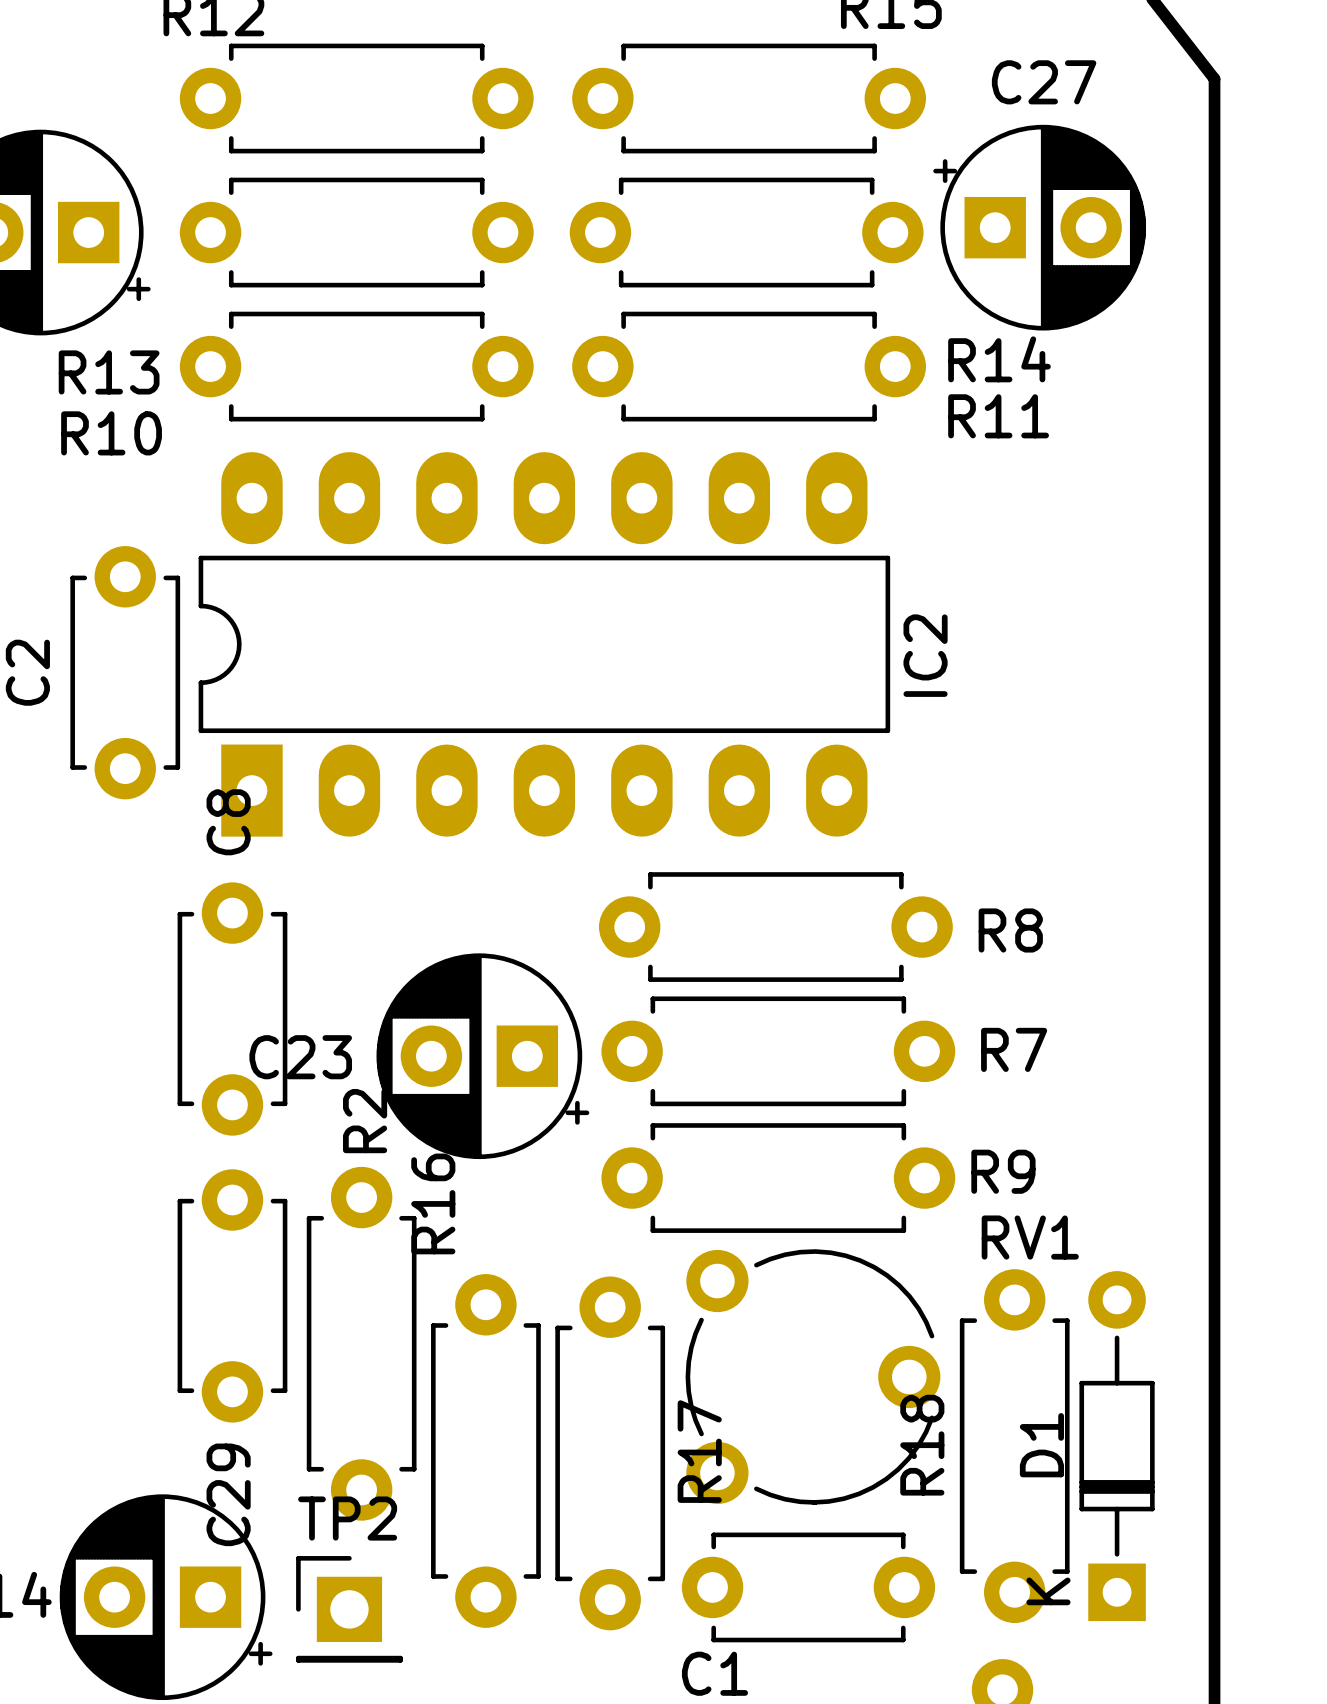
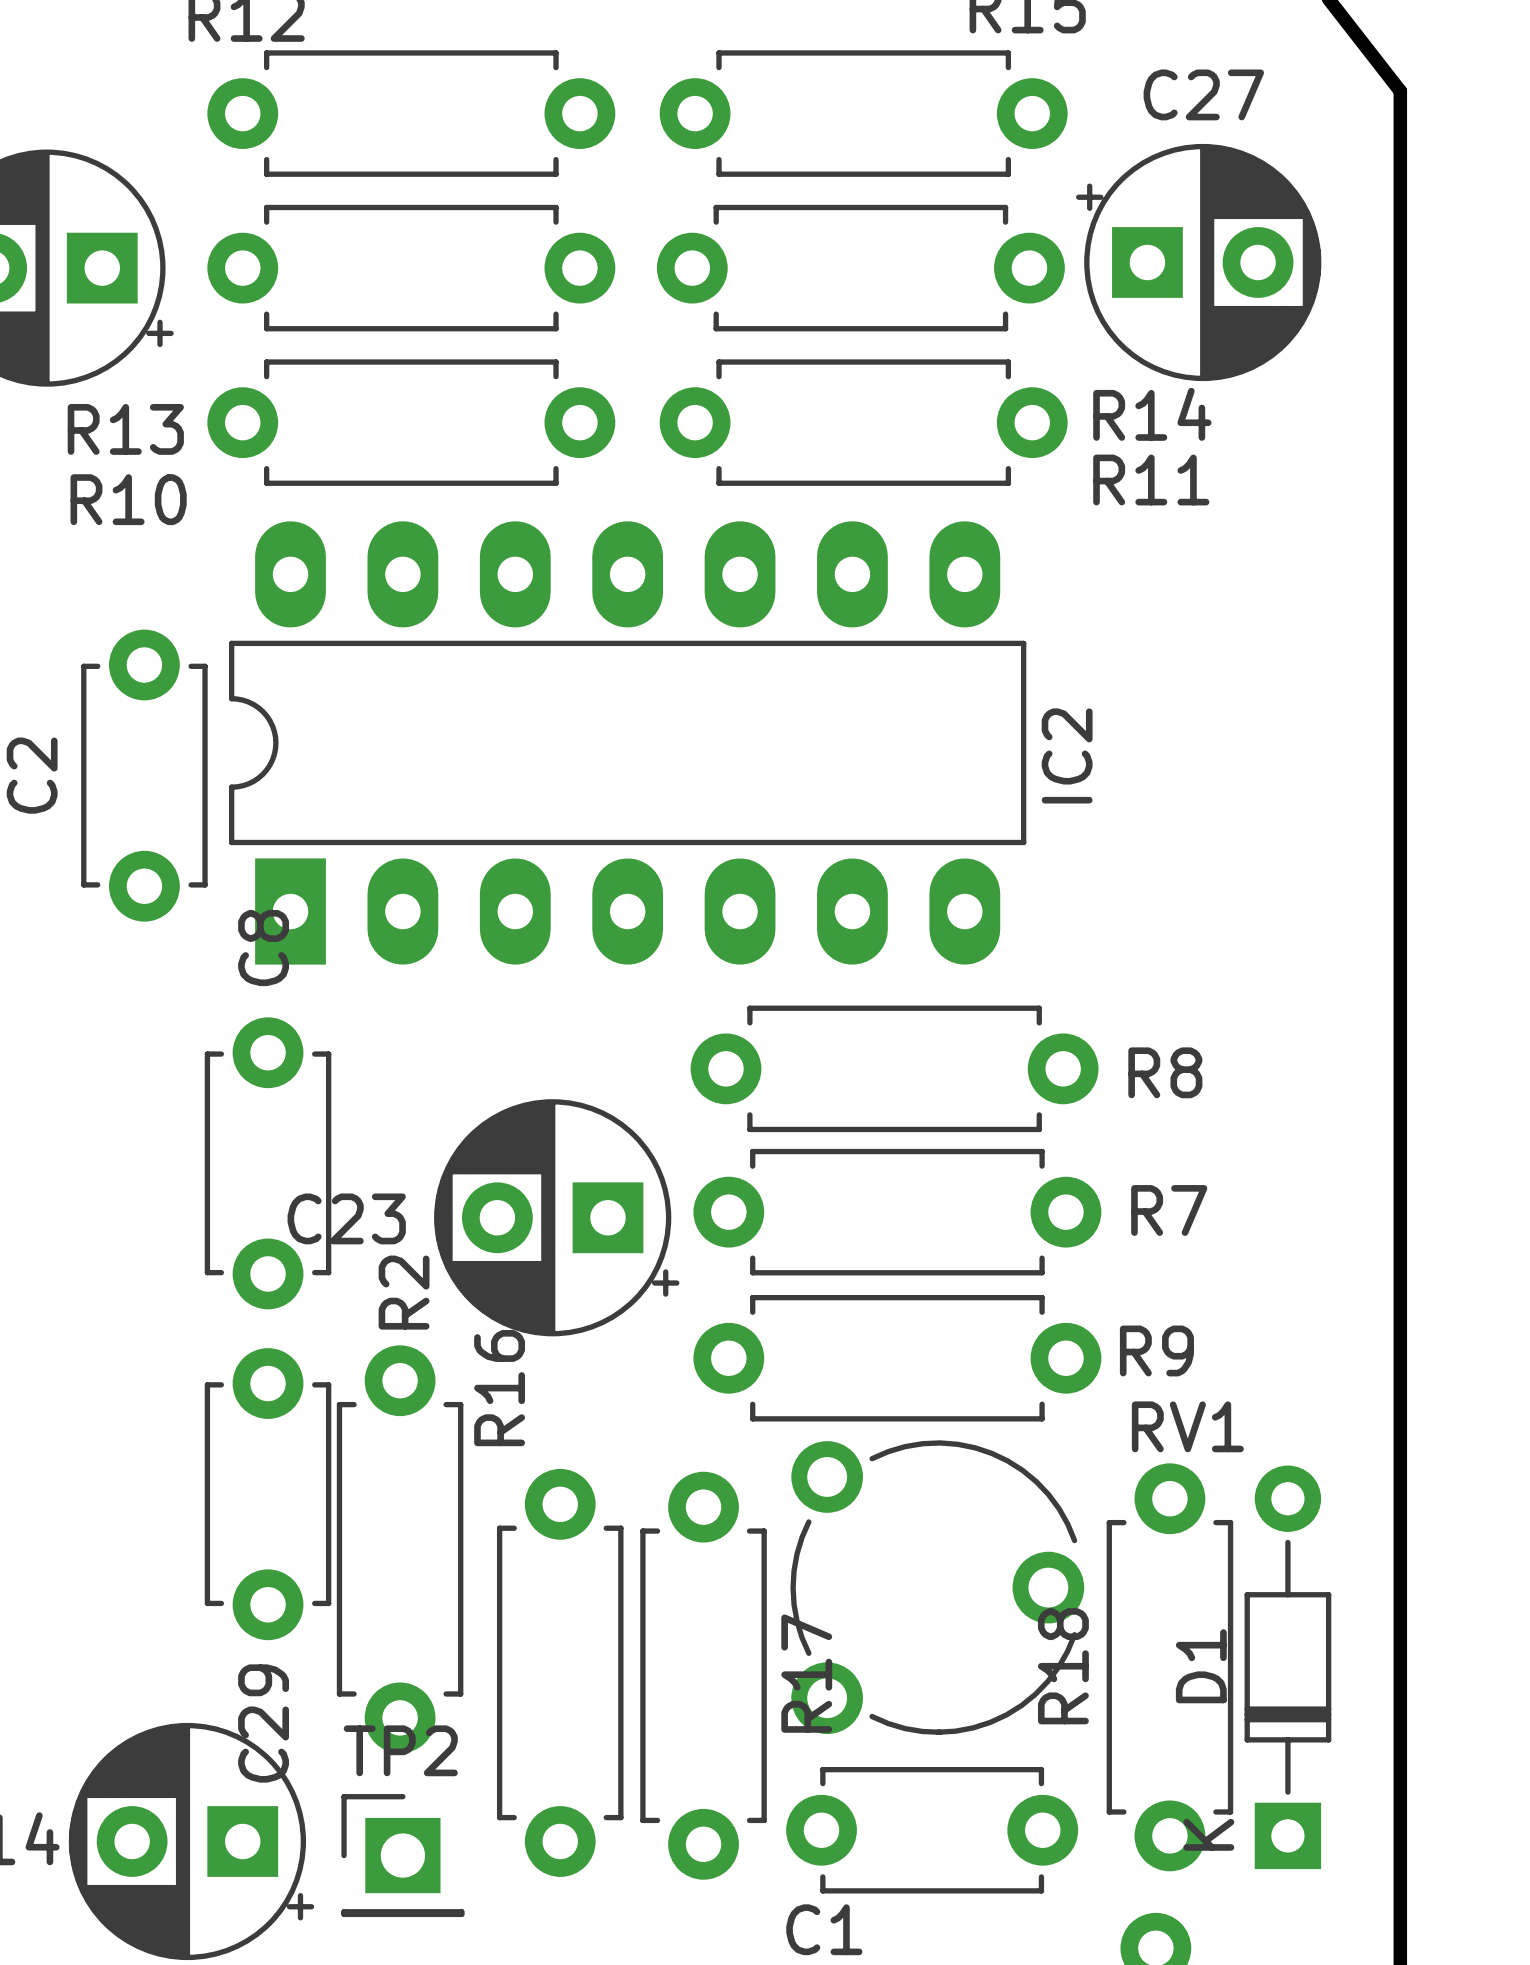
R2 position: (361, 1343) -> (400, 1549)

